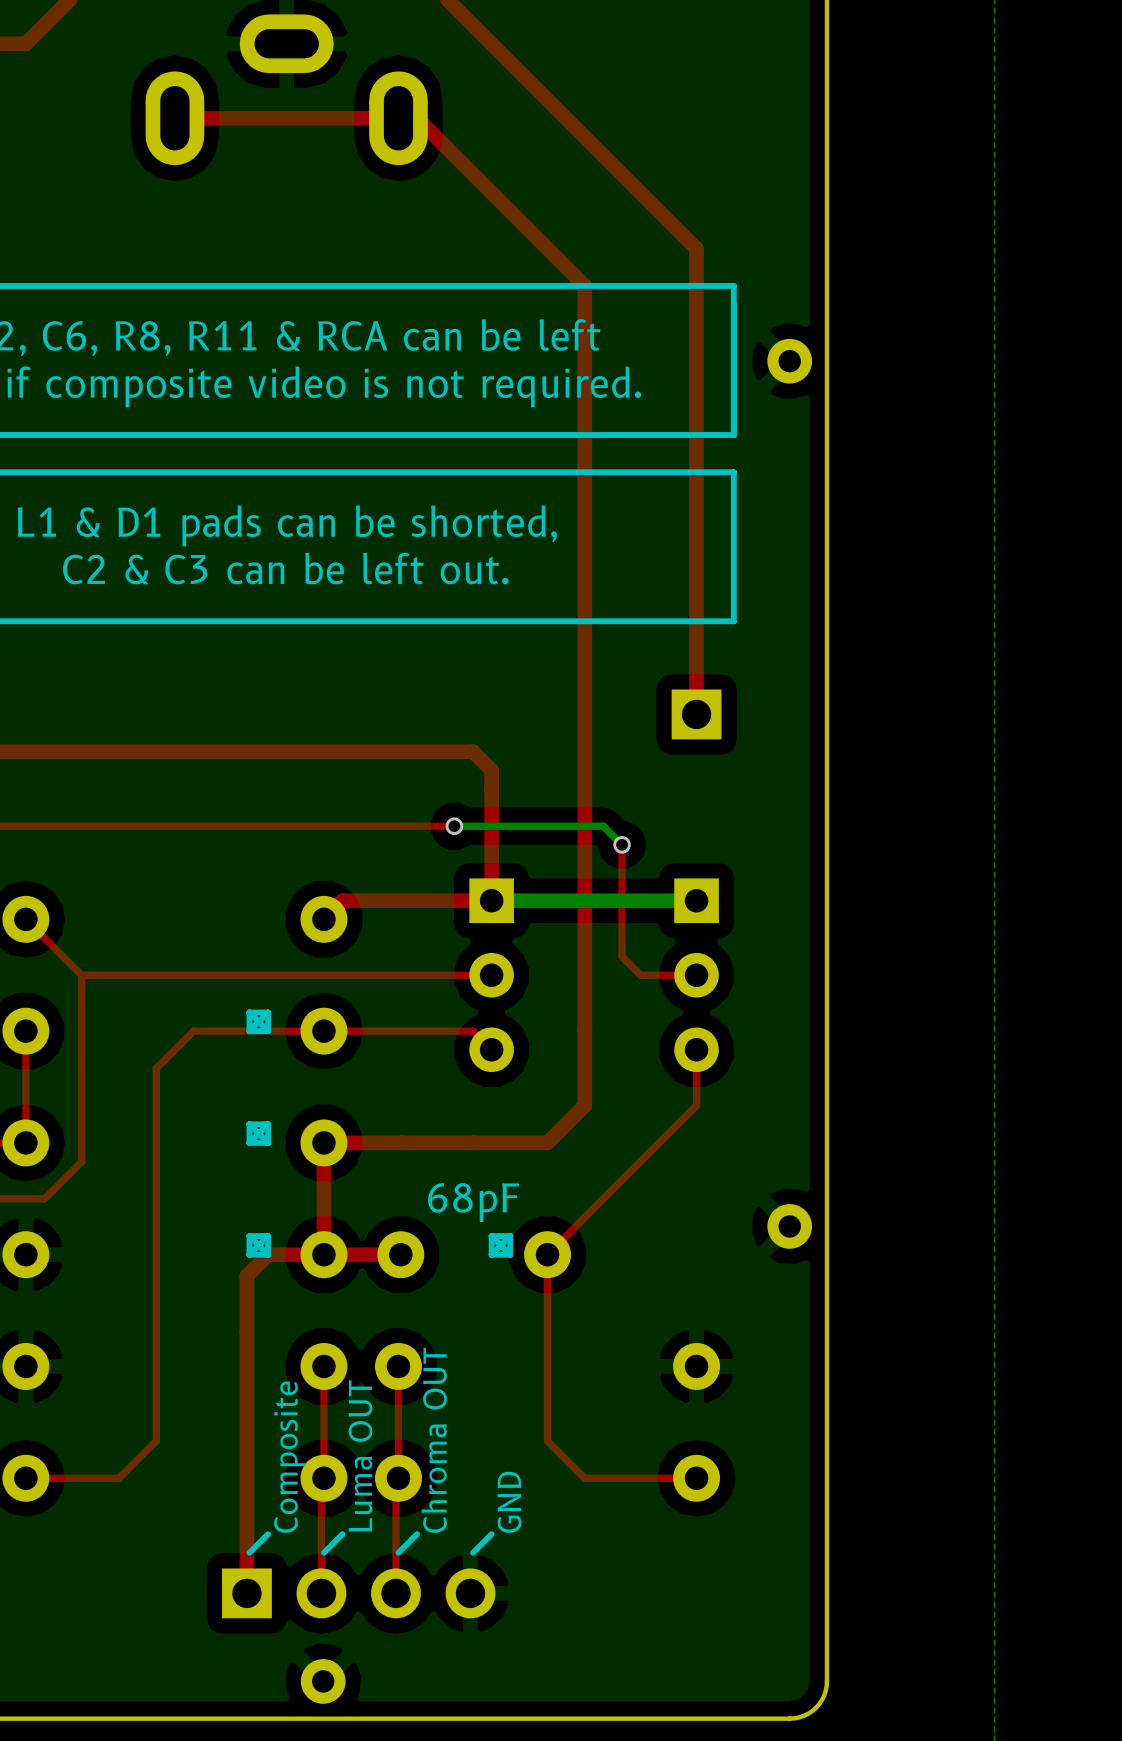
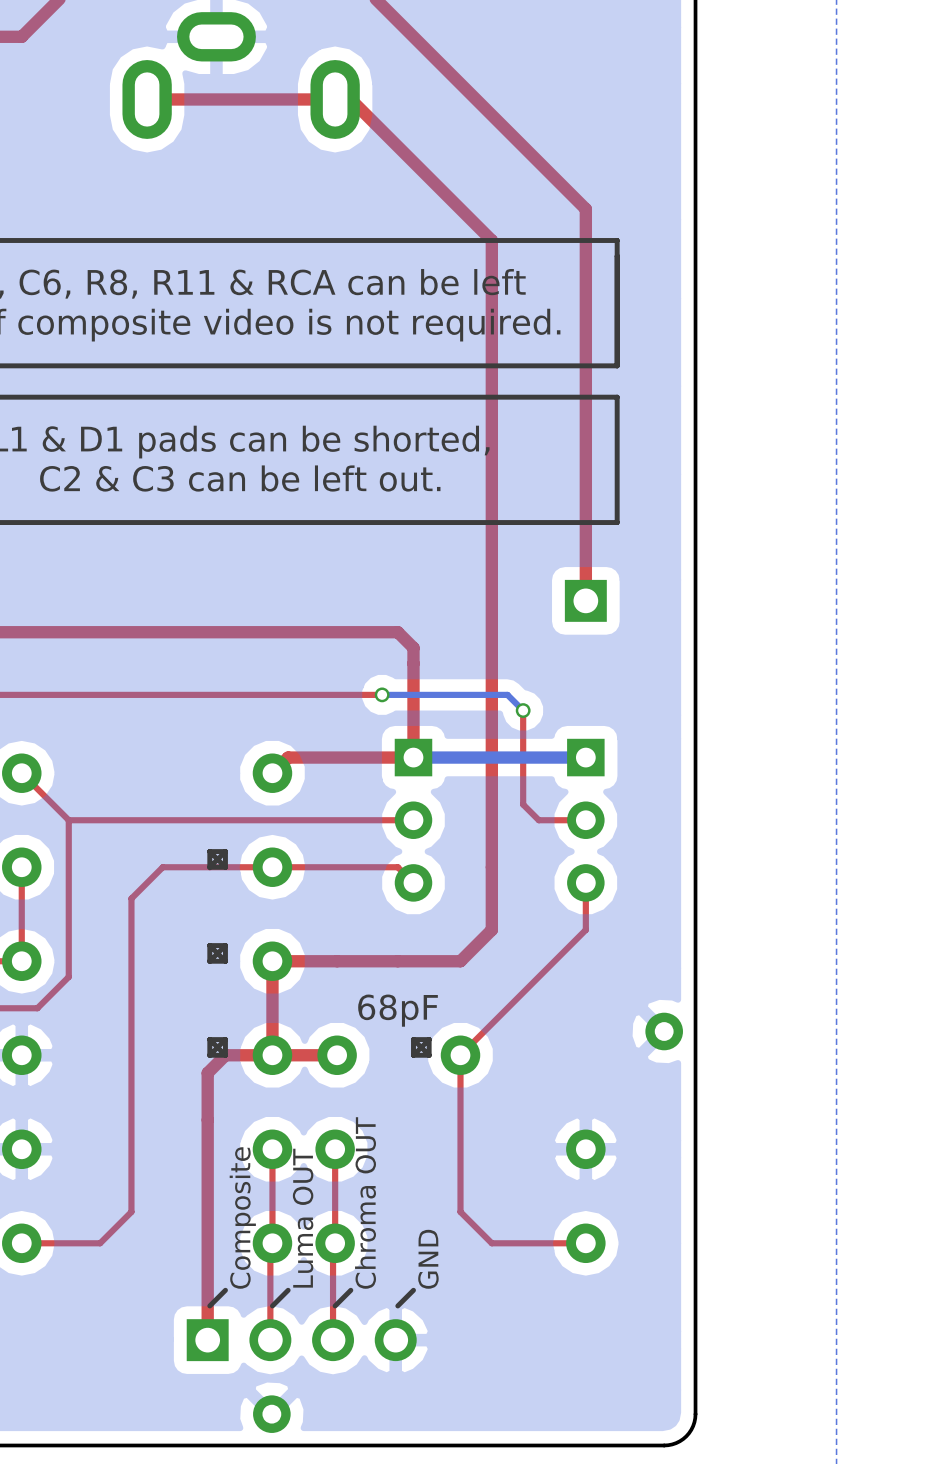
part footprint: [145, 14, 428, 166] -> [122, 12, 360, 139]
part: (789, 361) -> none

